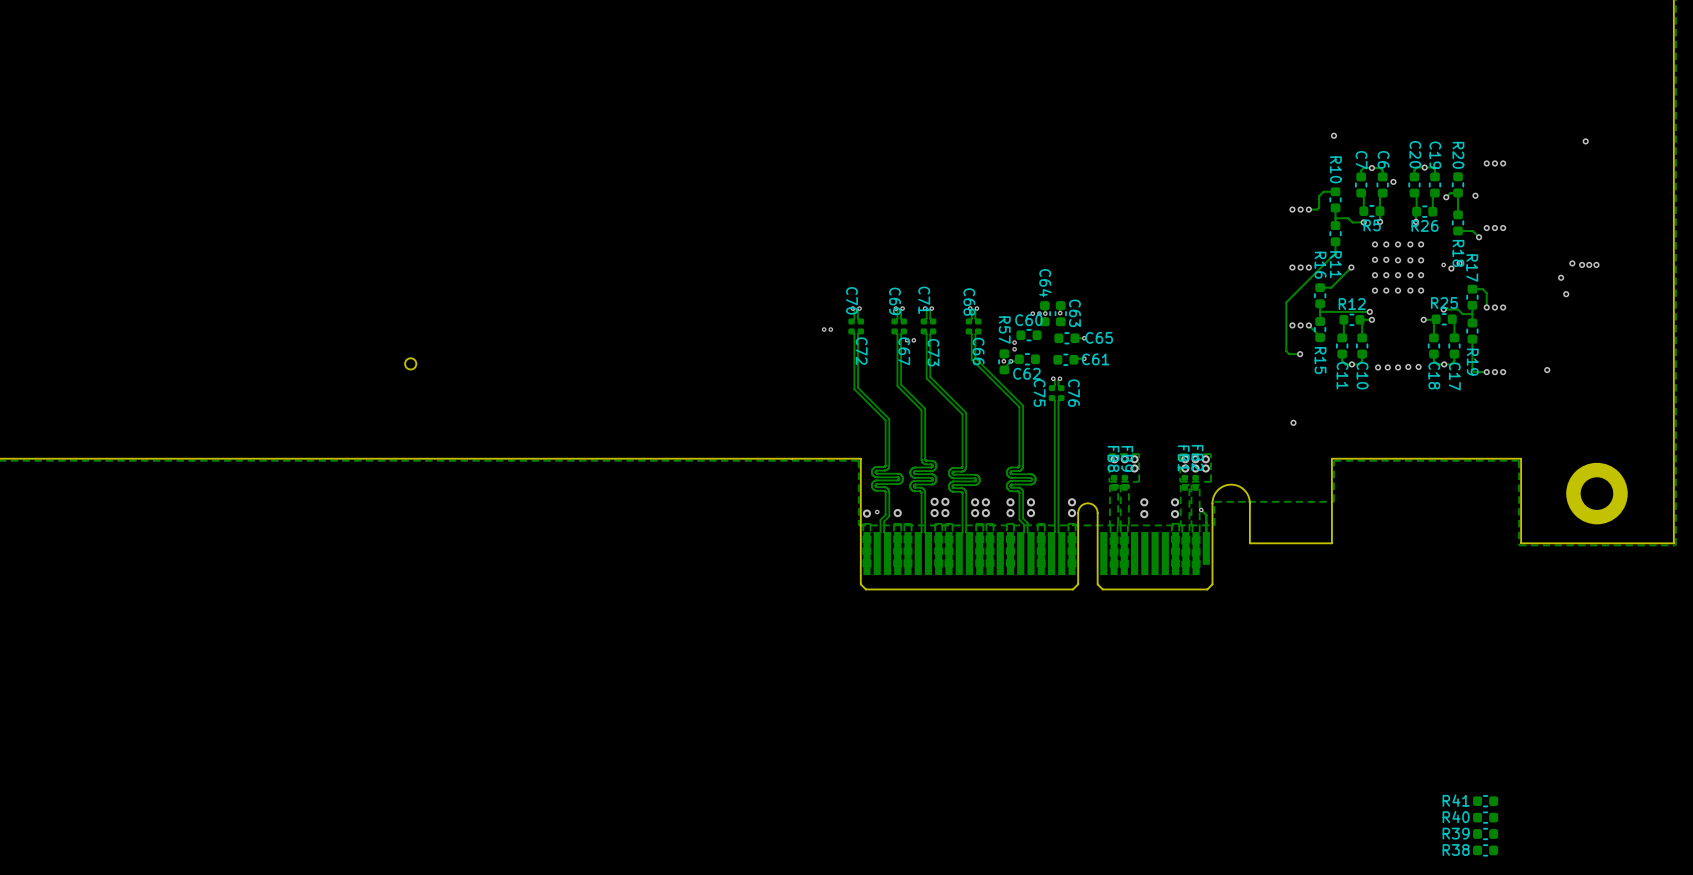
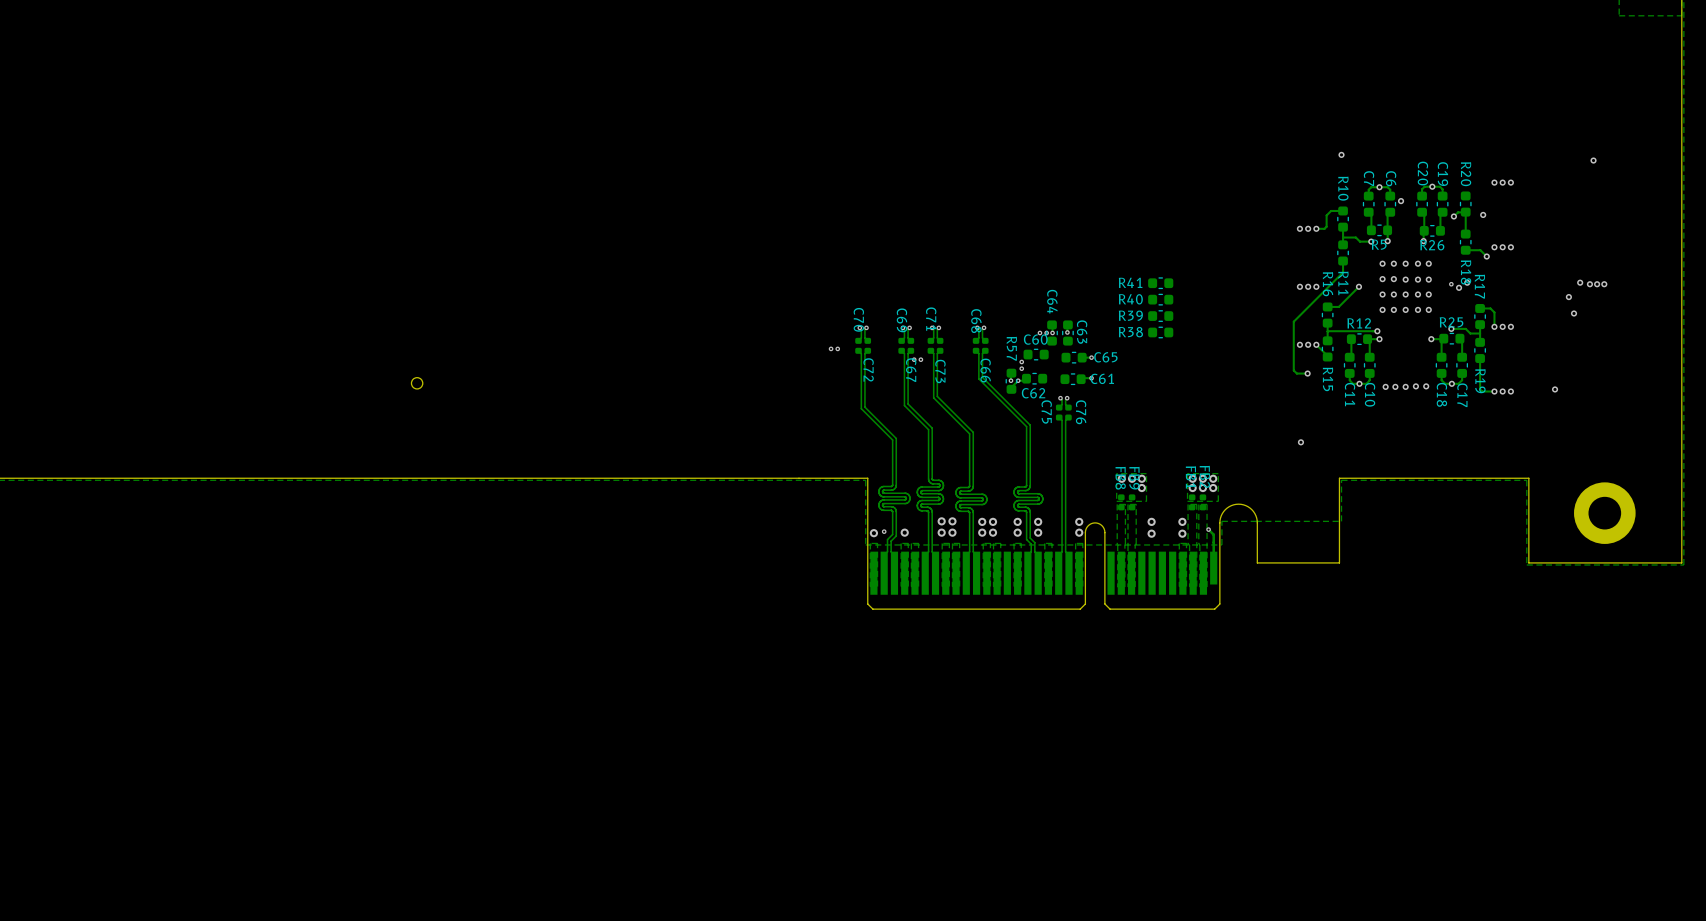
R41 position: (1485, 801) -> (1160, 283)
R40 position: (1485, 817) -> (1160, 299)
R39 position: (1485, 833) -> (1160, 316)
R38 position: (1485, 850) -> (1160, 332)

